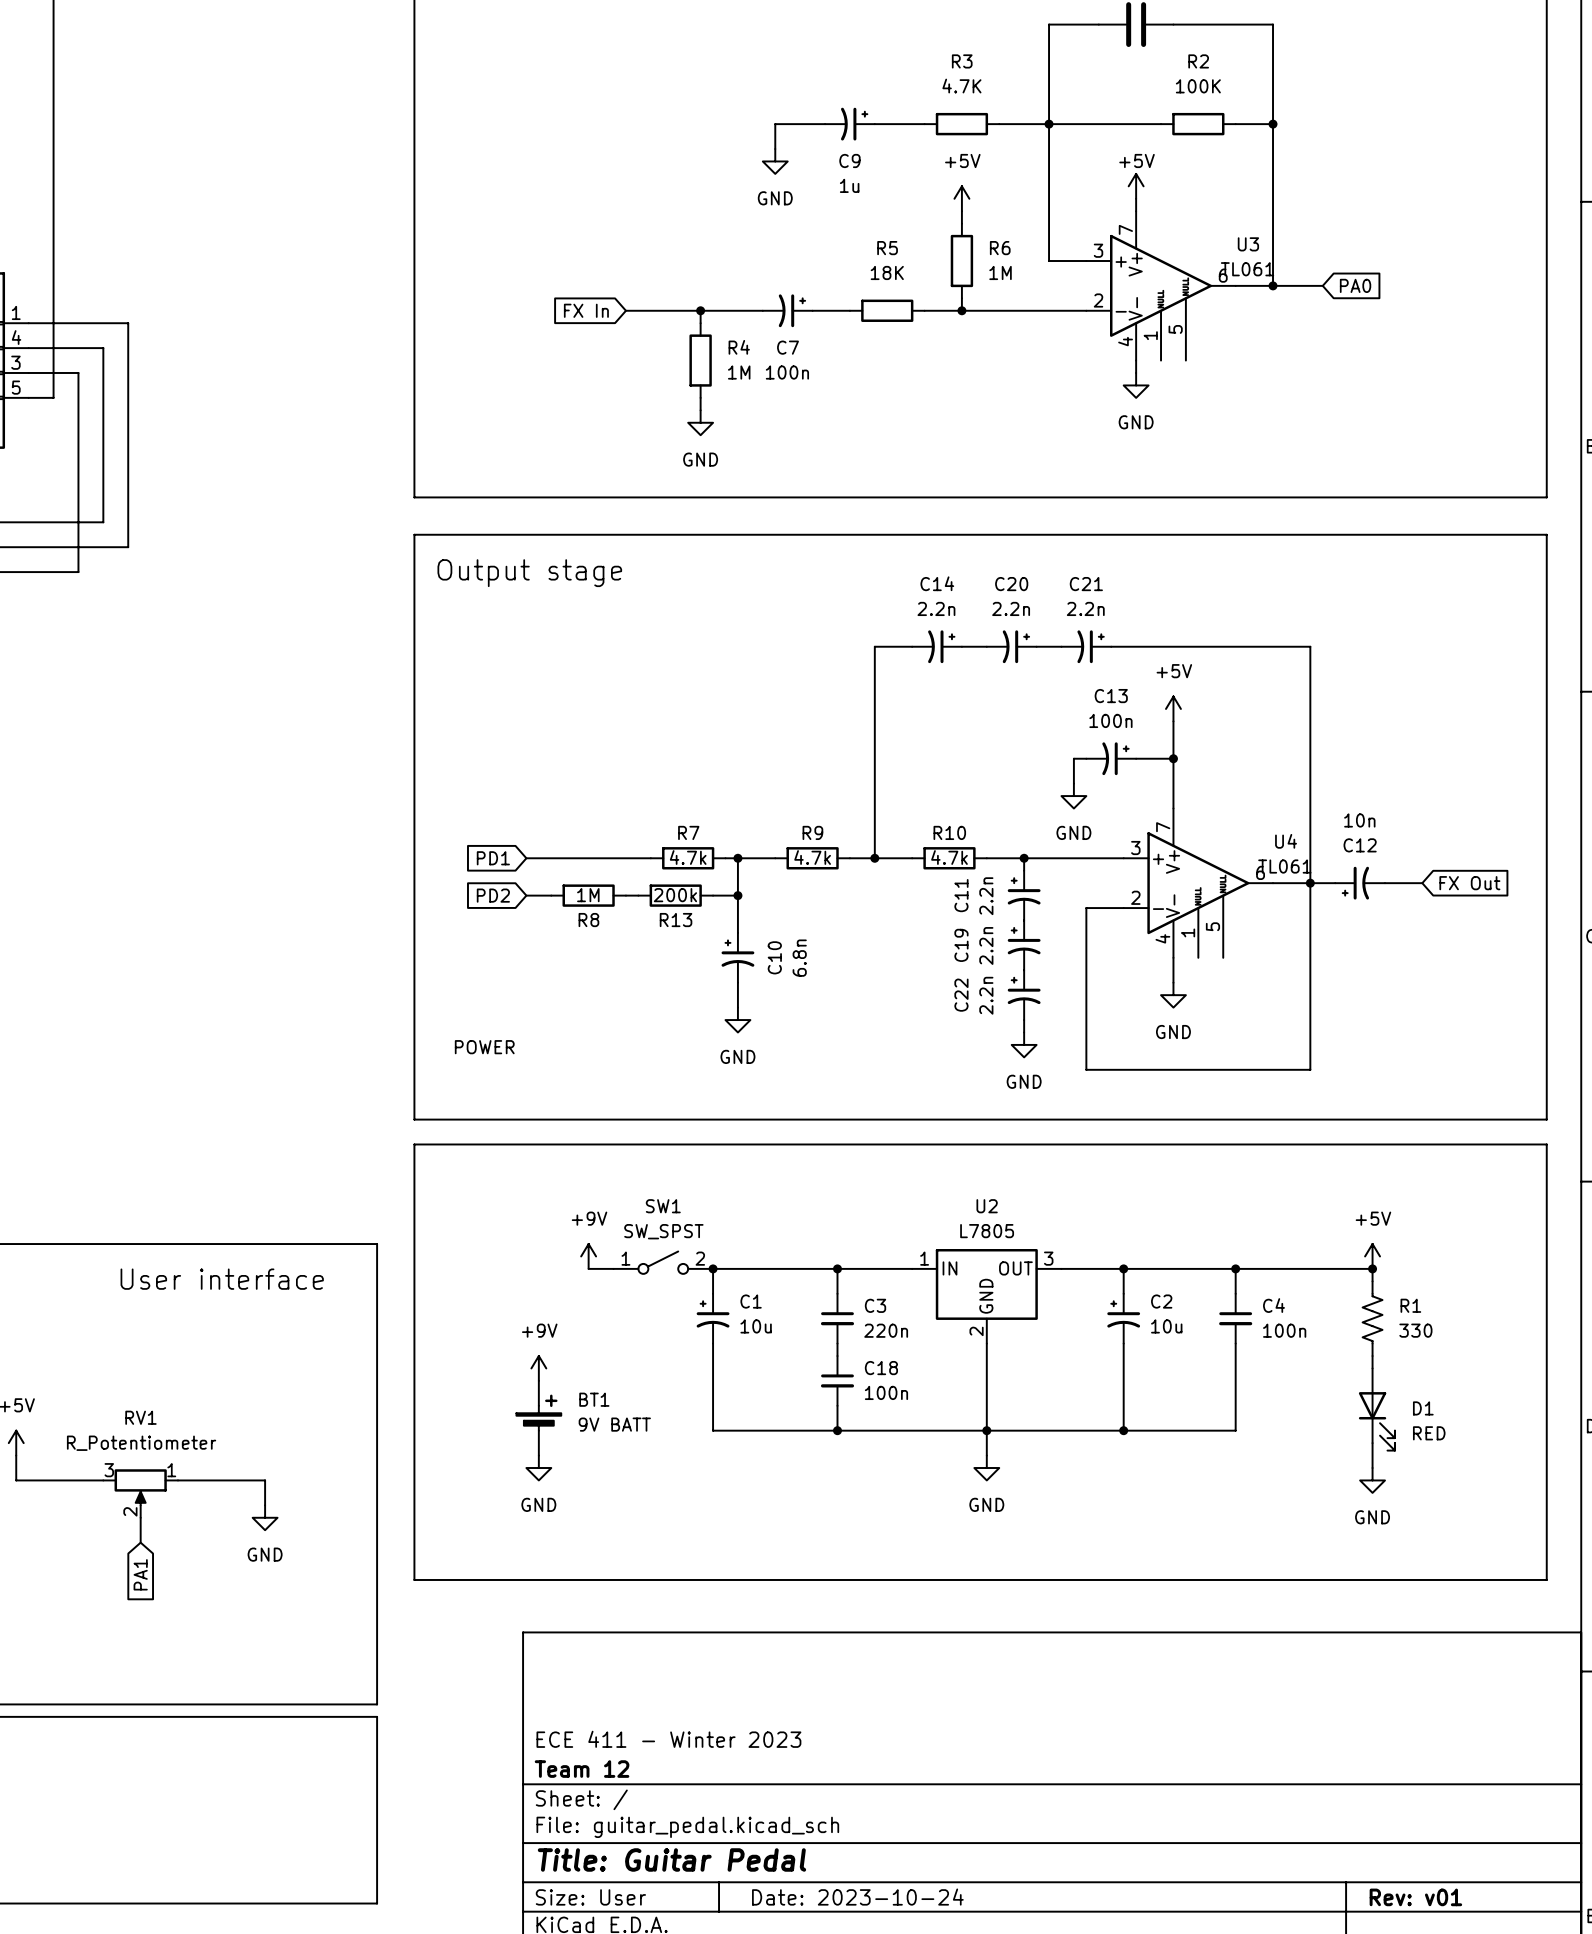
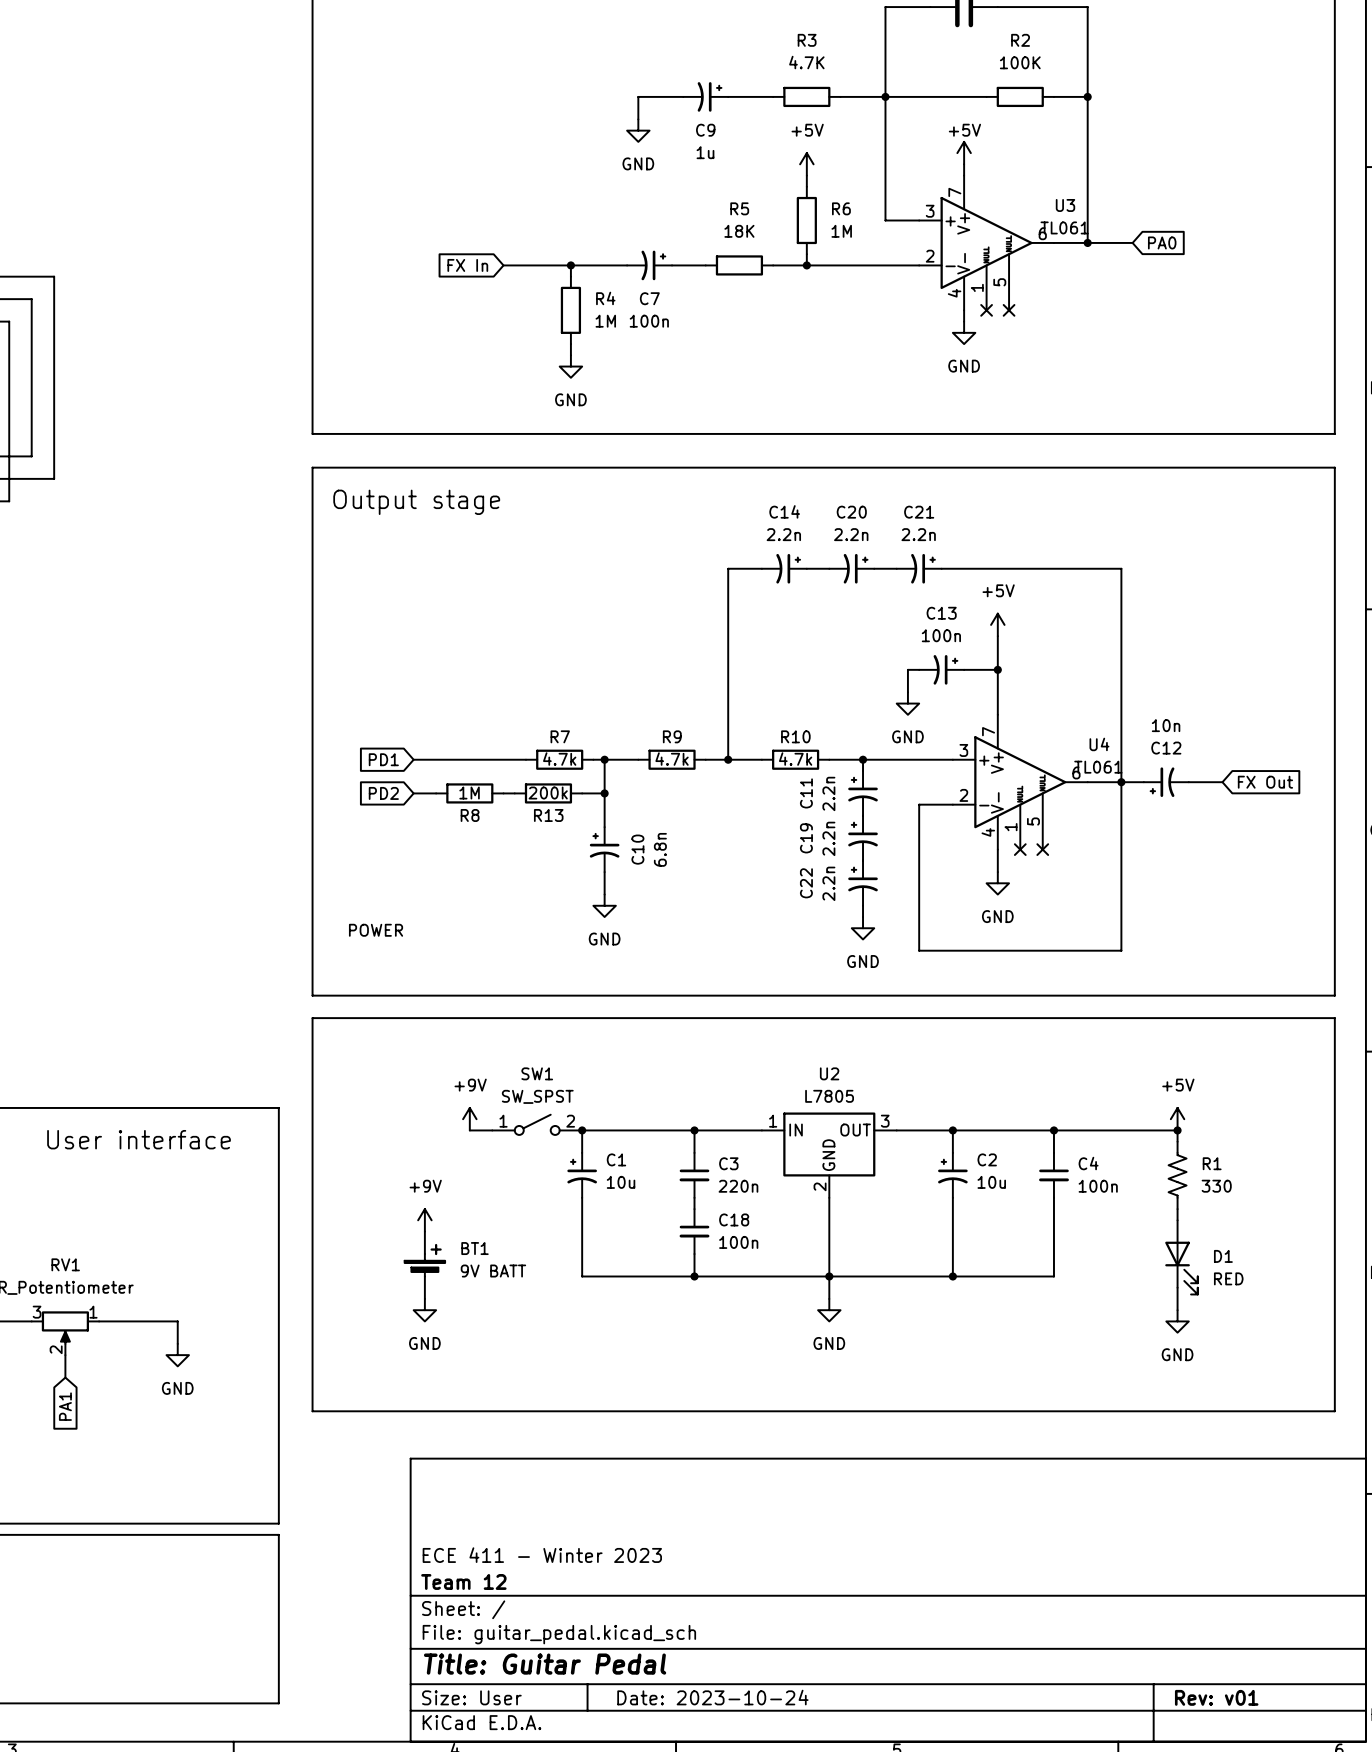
no-connect mark: none -> (986, 310)
no-connect mark: none -> (1009, 310)
no-connect mark: none -> (1020, 849)
no-connect mark: none -> (1042, 849)

